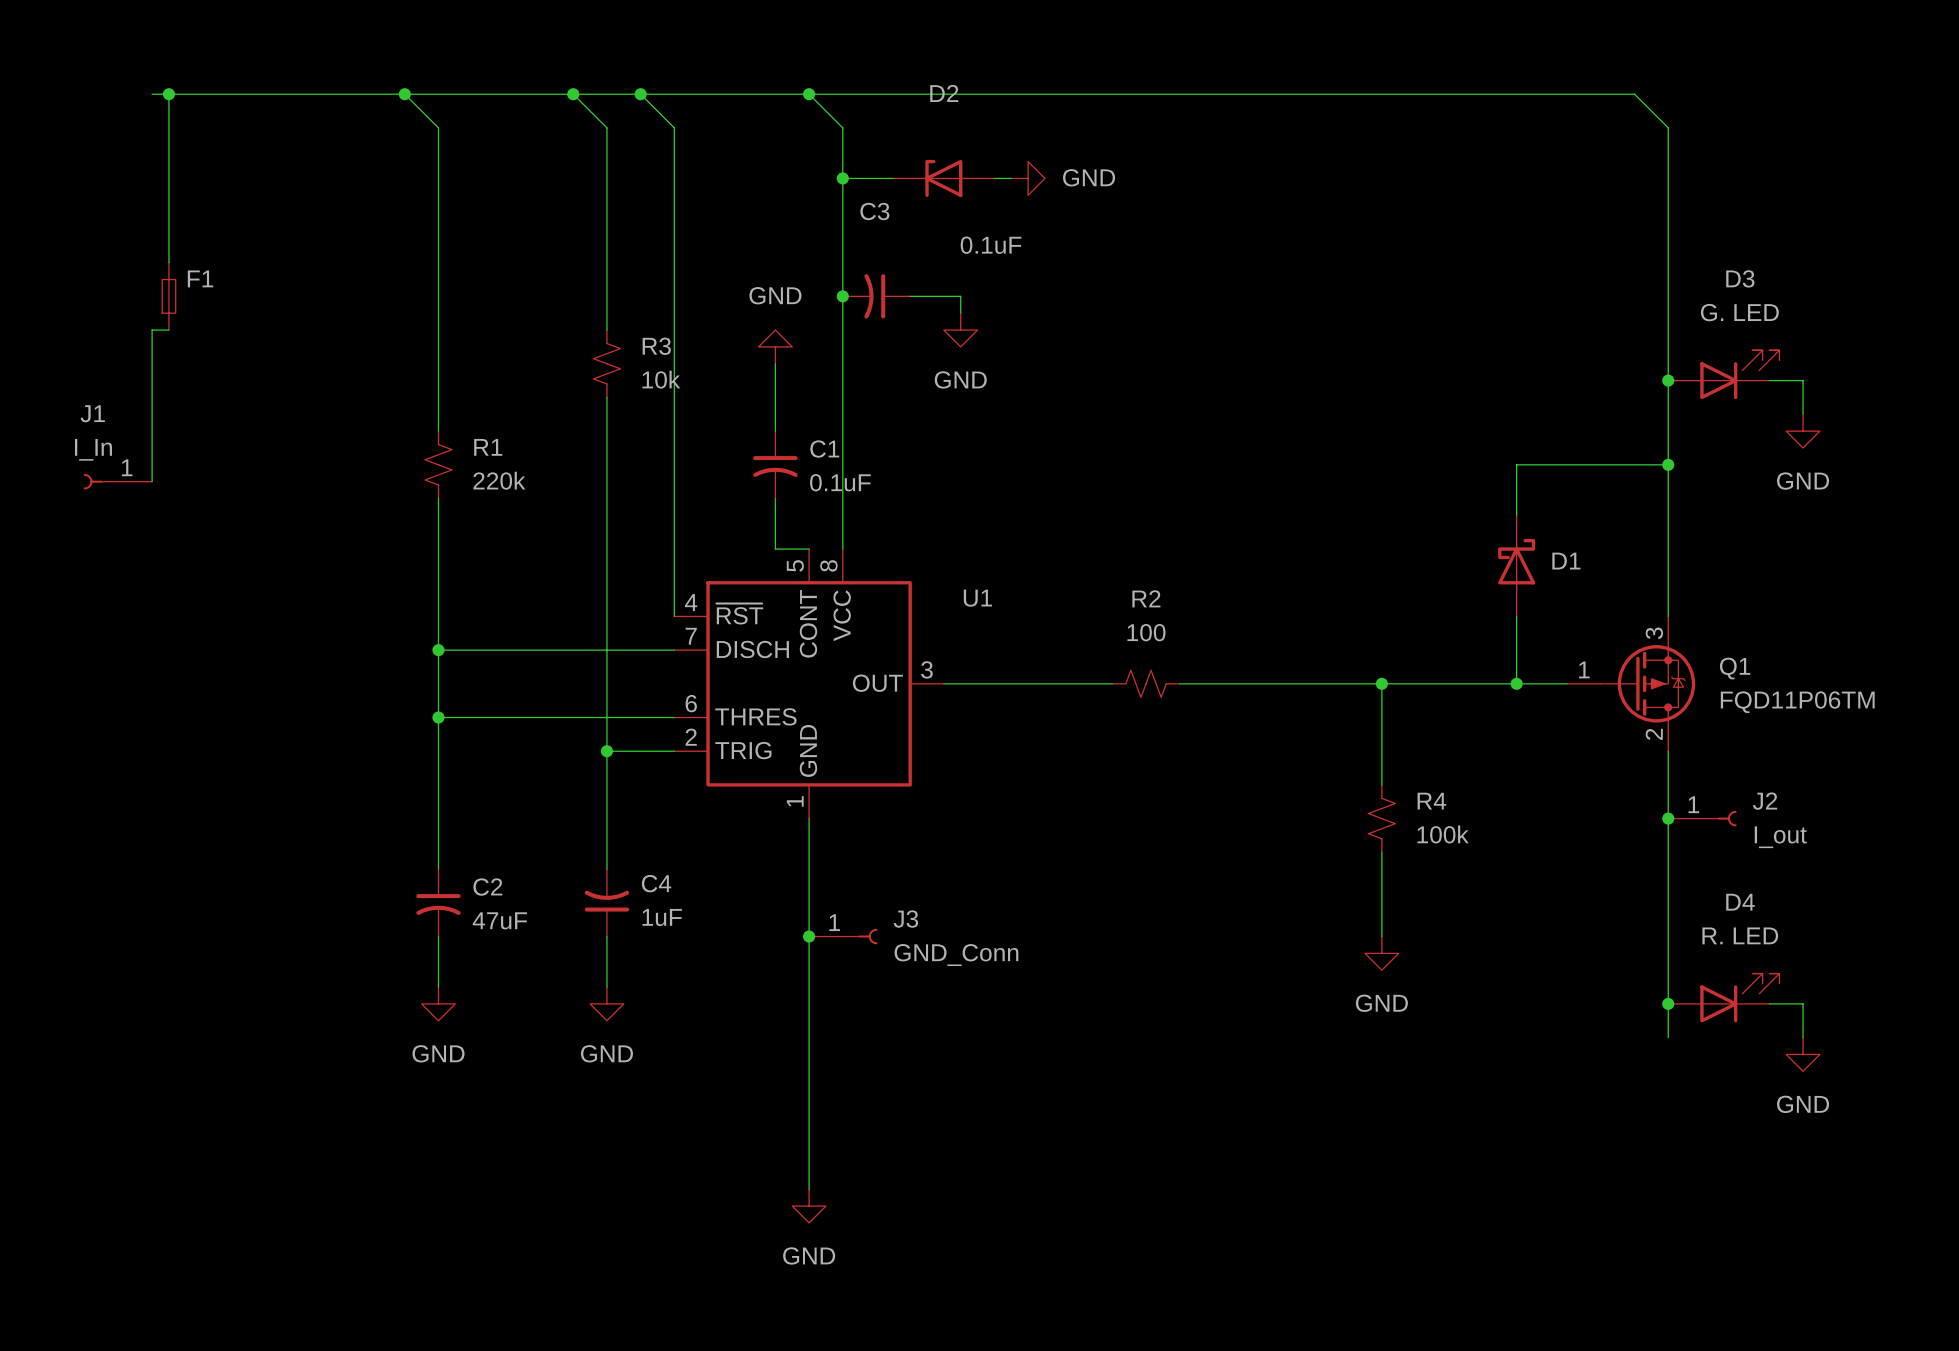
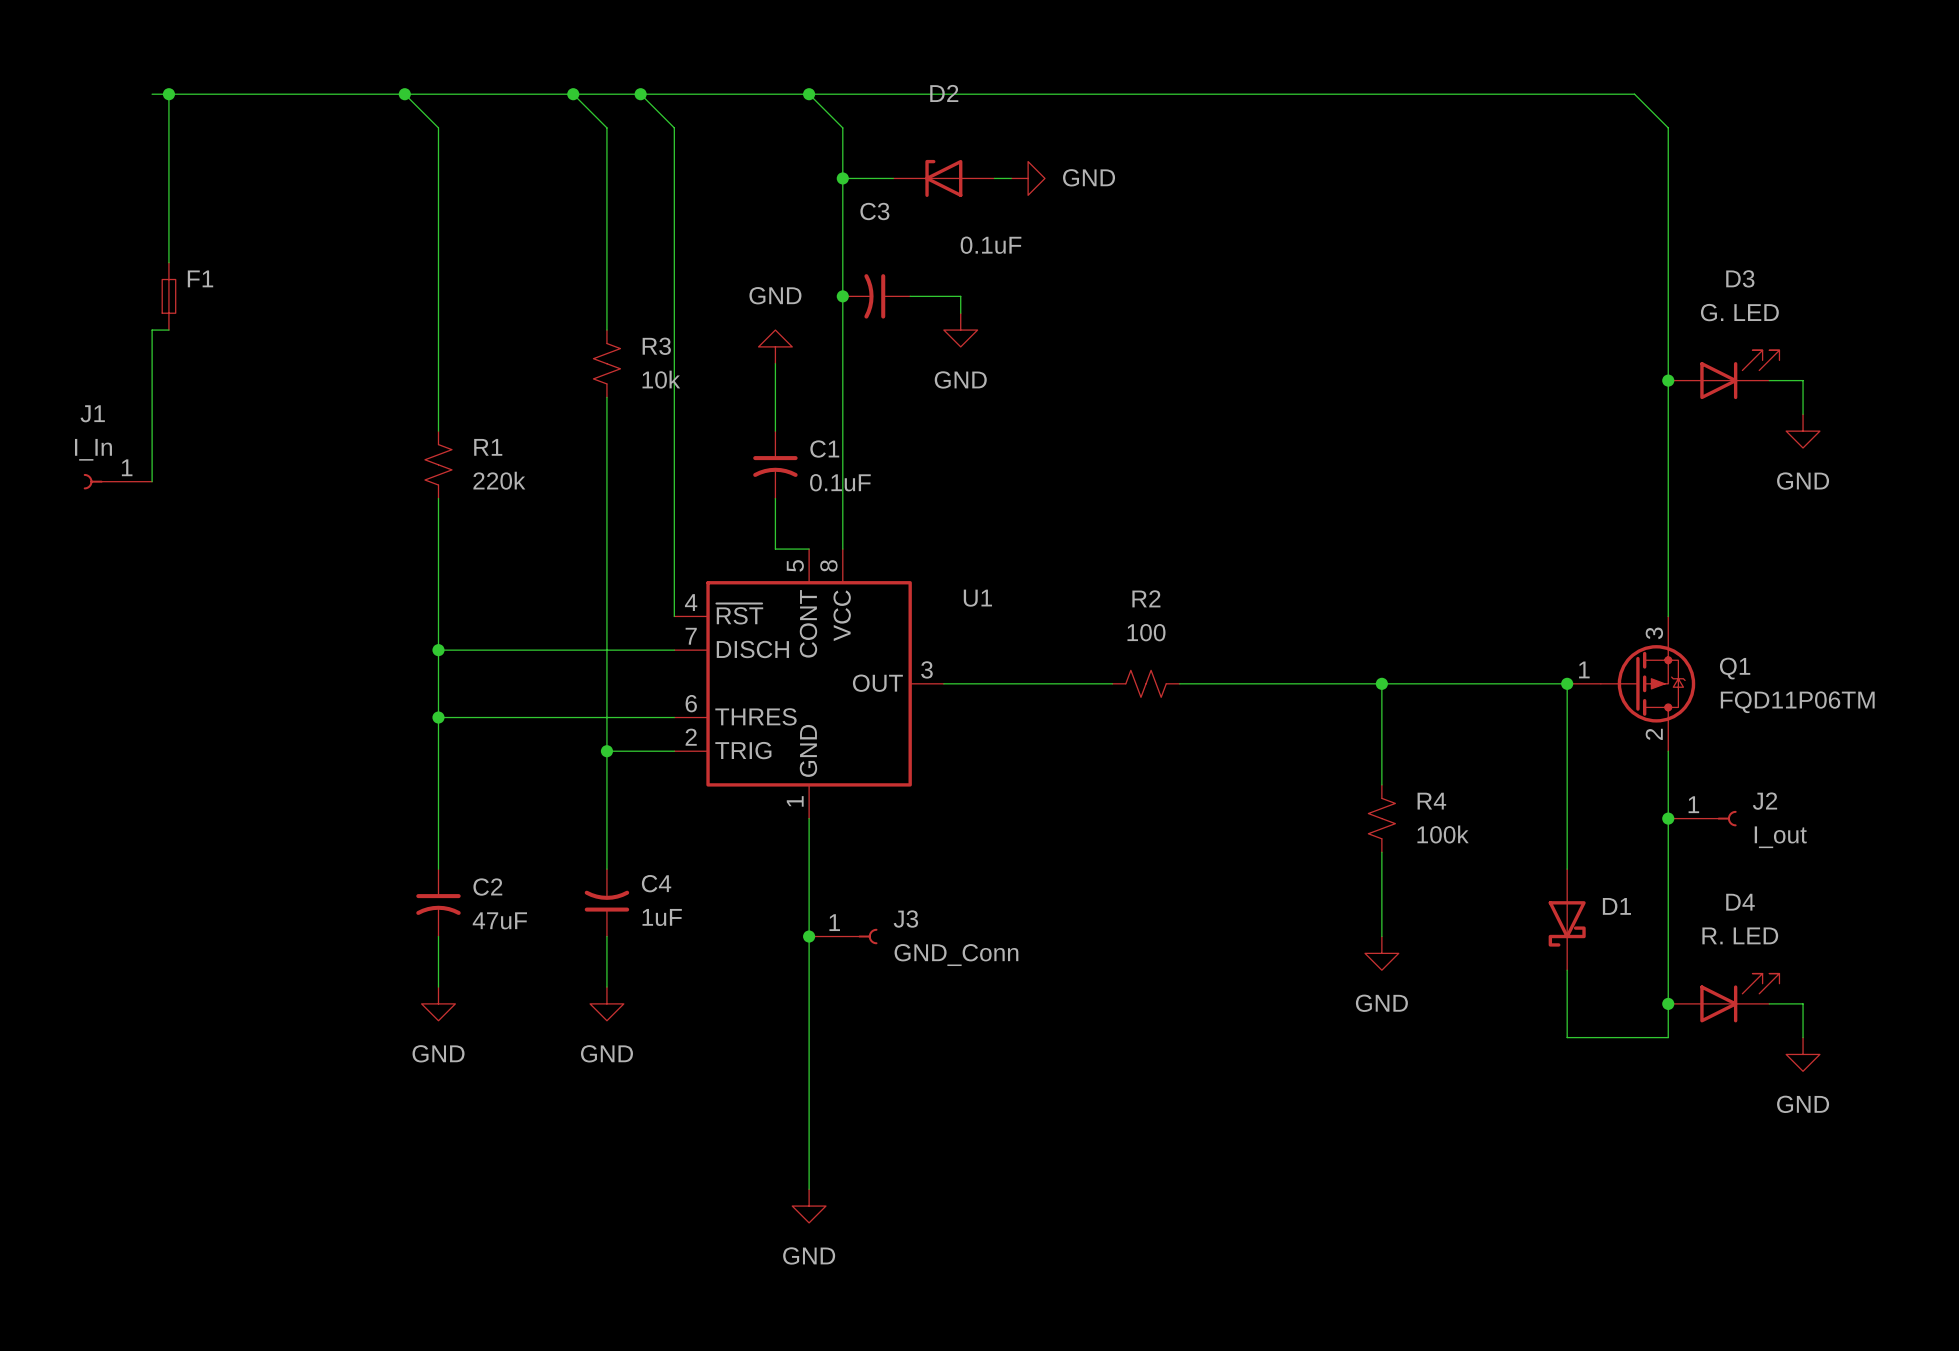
wire: (1668, 464) (1516, 464) (1516, 515) -> none
junction: (1668, 464) -> none
D1 rotation: 0° (1516, 561) -> 180° (1567, 923)
D1 position: (1516, 565) -> (1567, 919)
wire: (1516, 616) (1516, 683) -> none
junction position: (1516, 683) -> (1567, 683)
wire: none -> (1567, 683) (1567, 869)
wire: none -> (1567, 970) (1567, 1037) (1668, 1037)

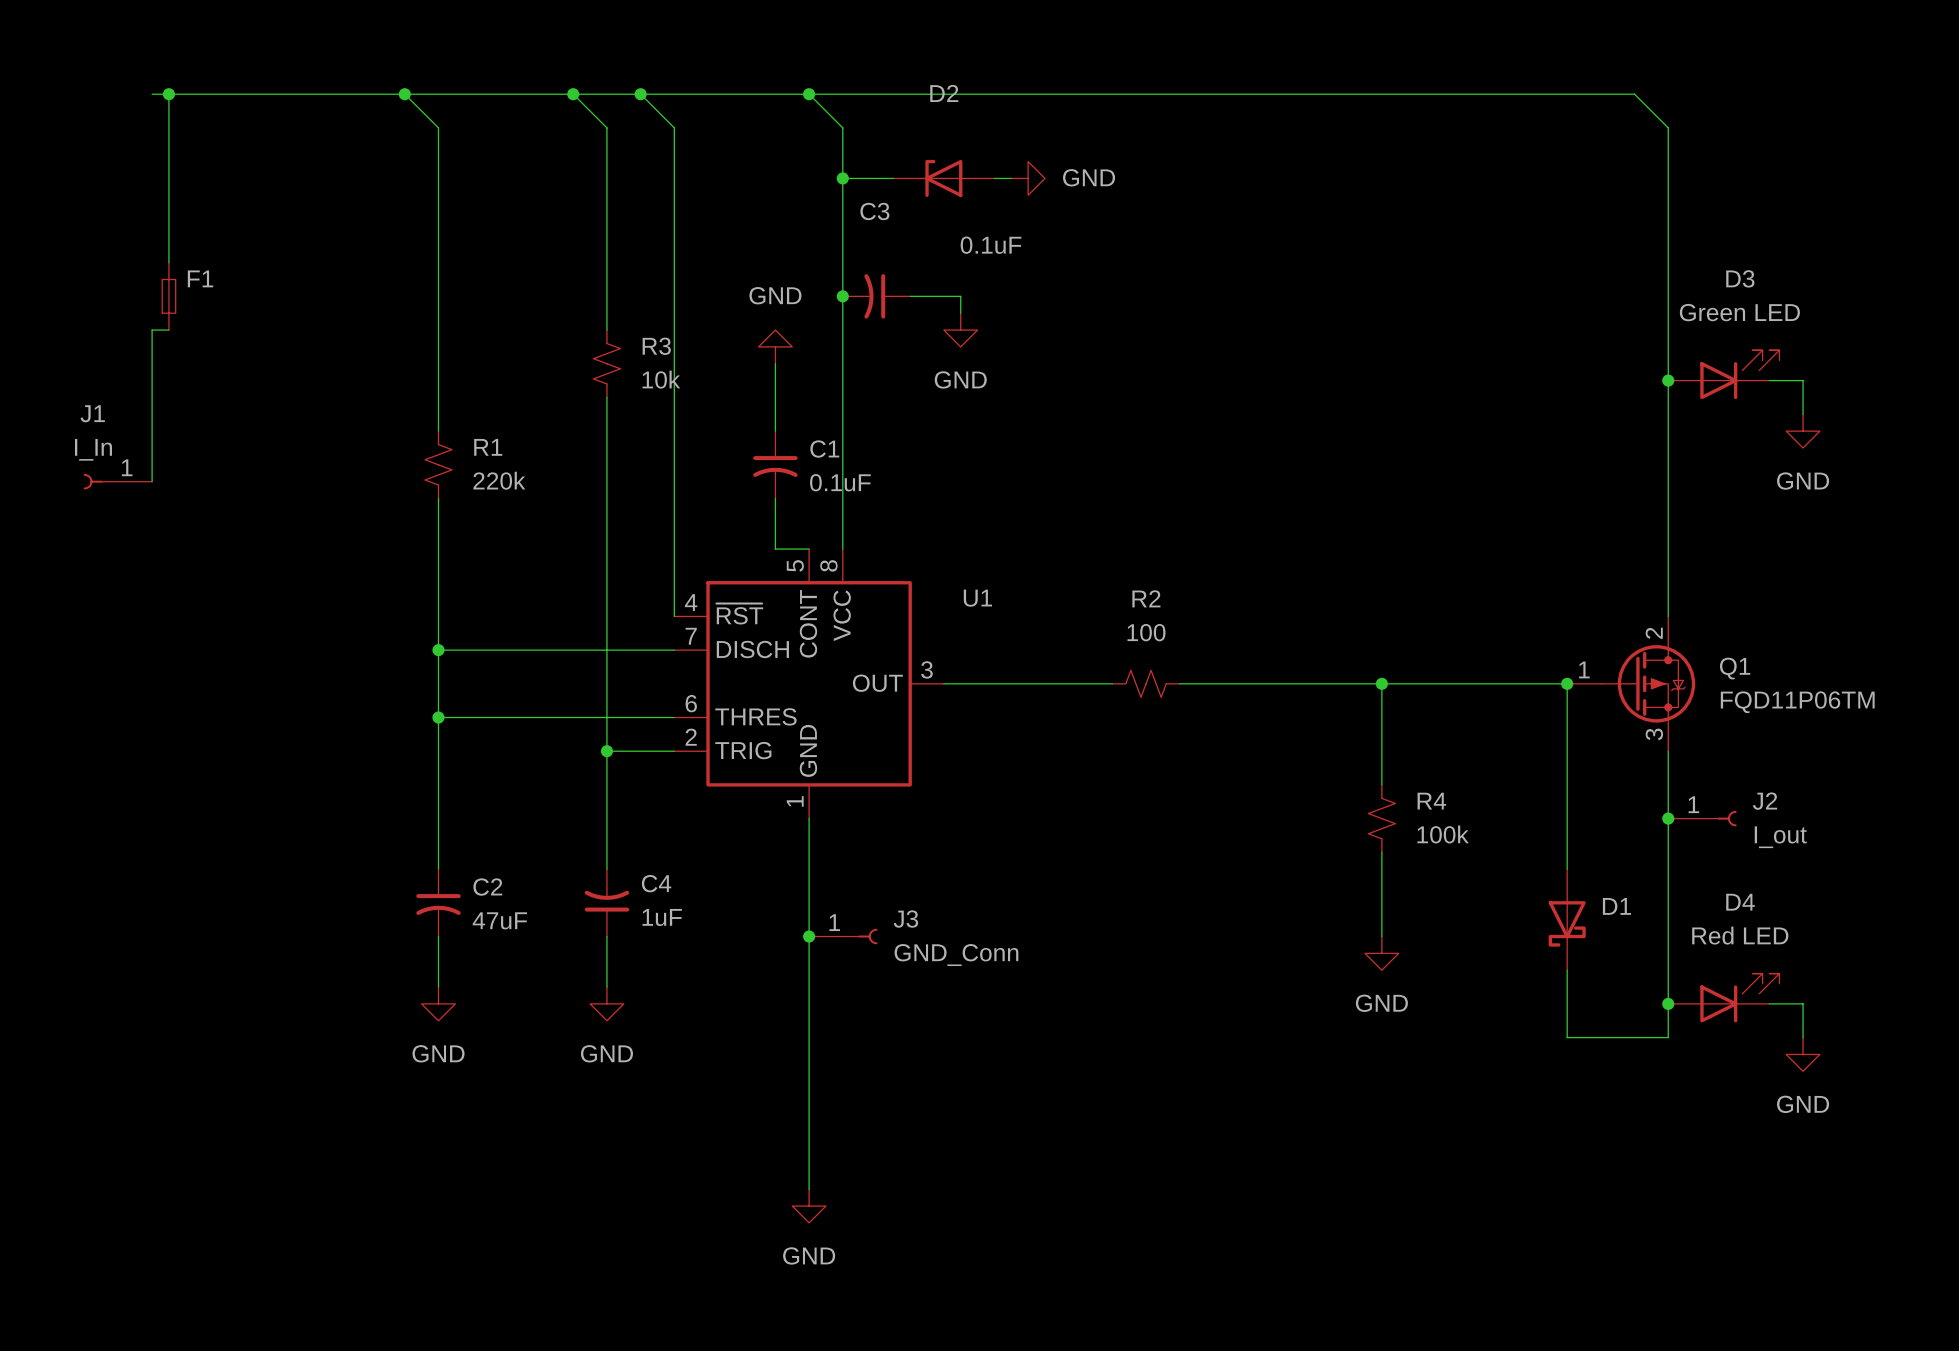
D3 value: G. LED (1739, 312) -> Green LED (1739, 312)
Q1 flip: as is (1648, 683) -> up-down (1648, 683)
D4 value: R. LED (1740, 935) -> Red LED (1740, 935)

